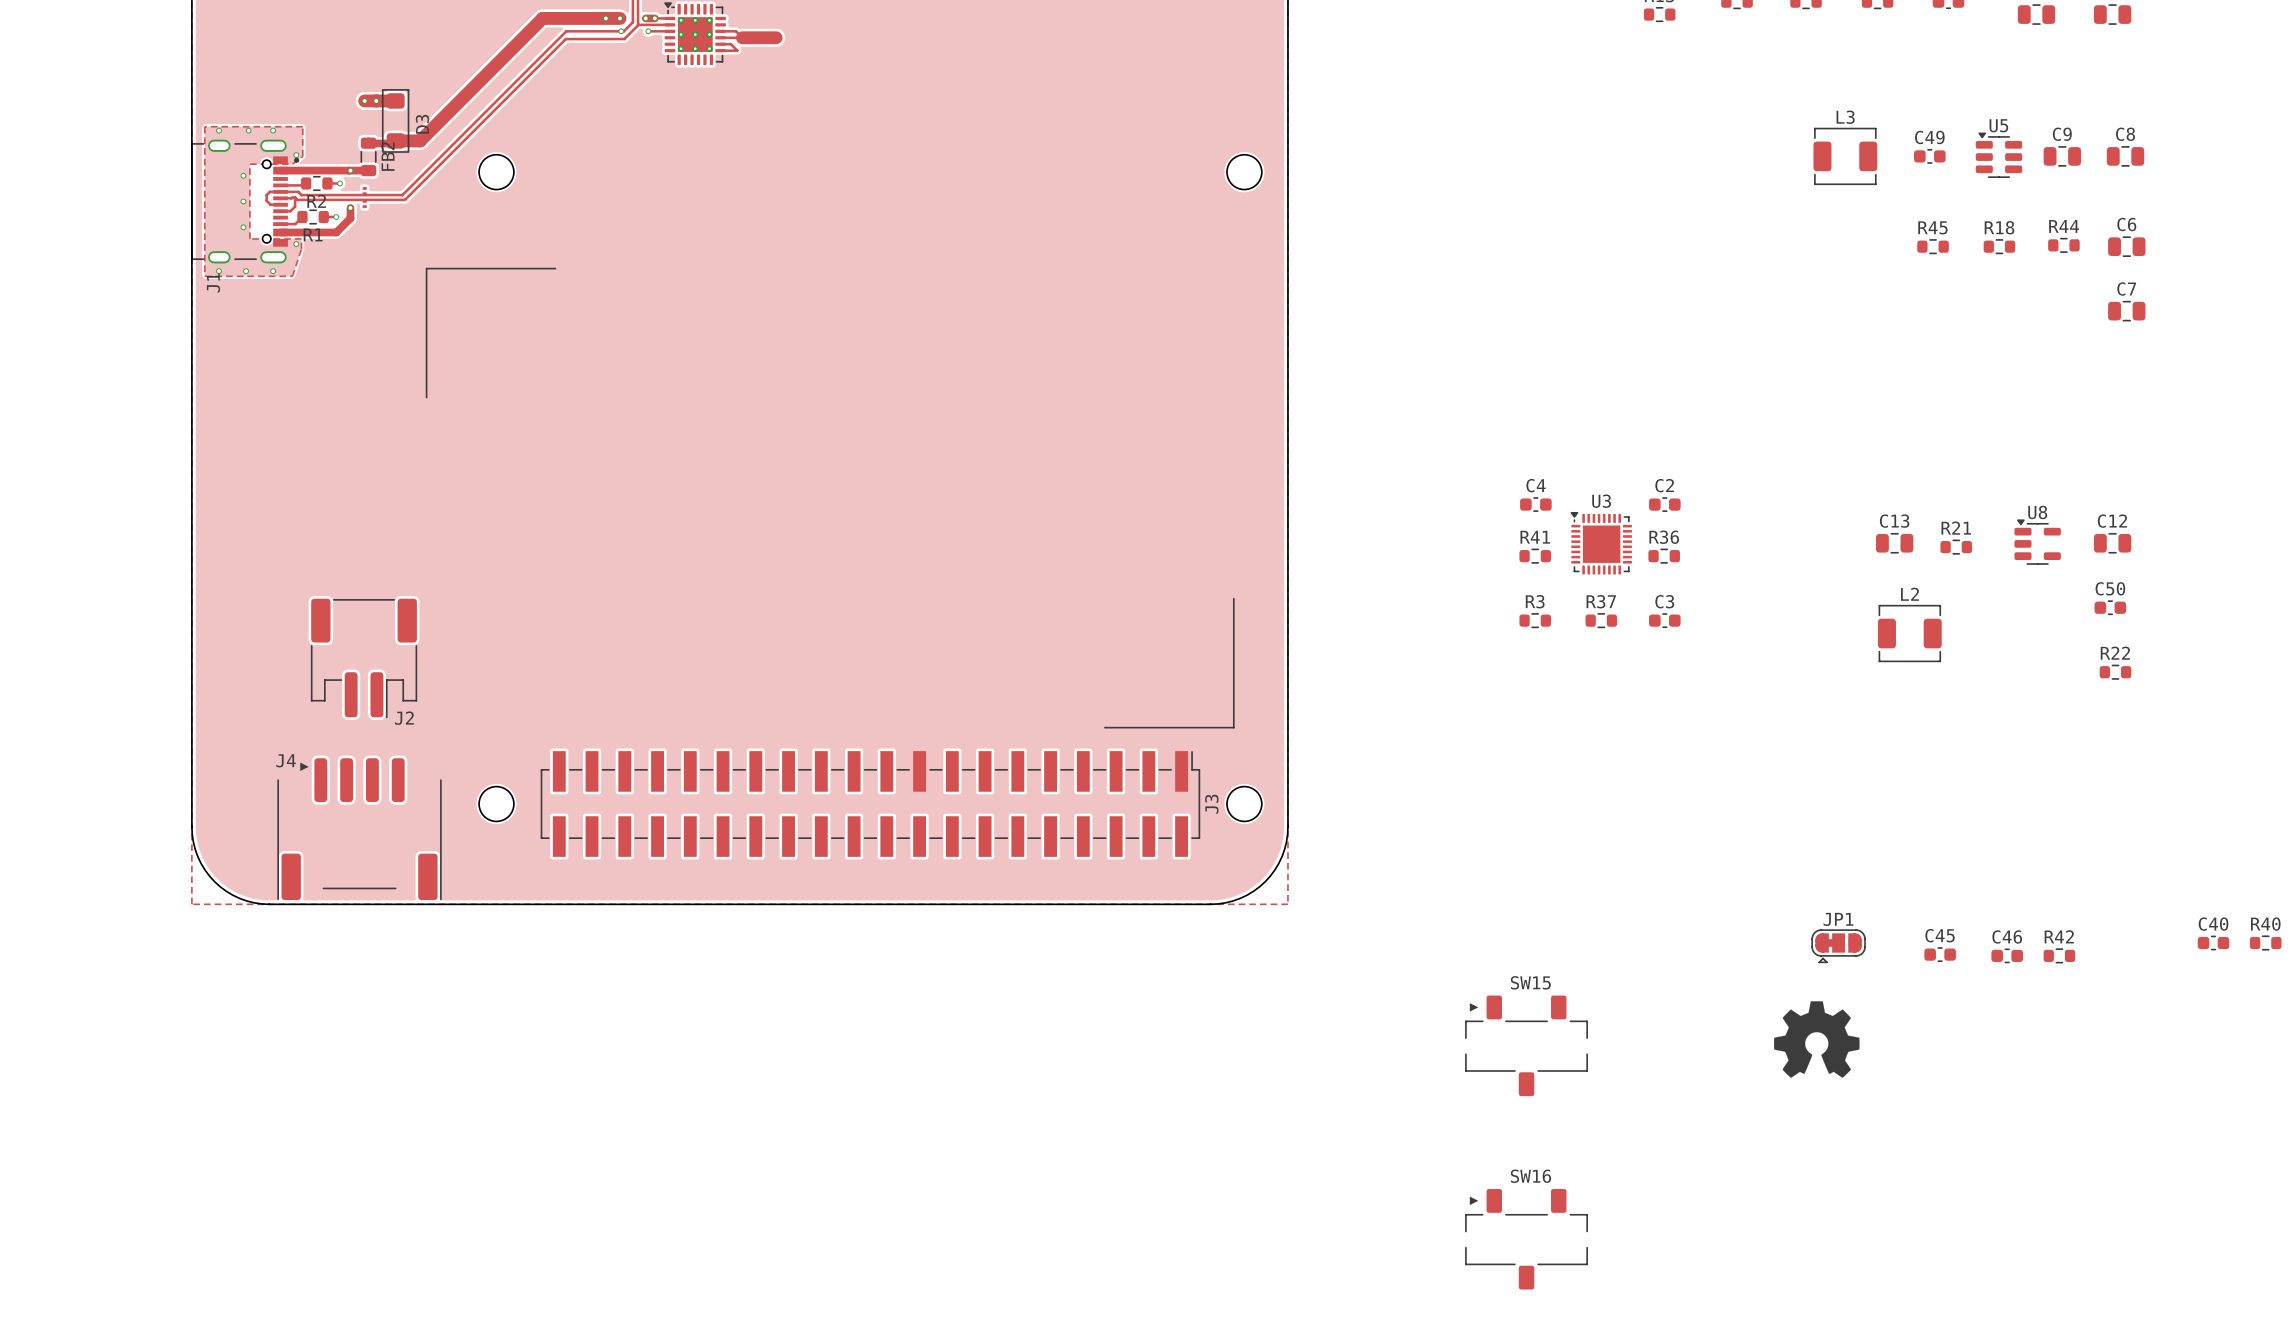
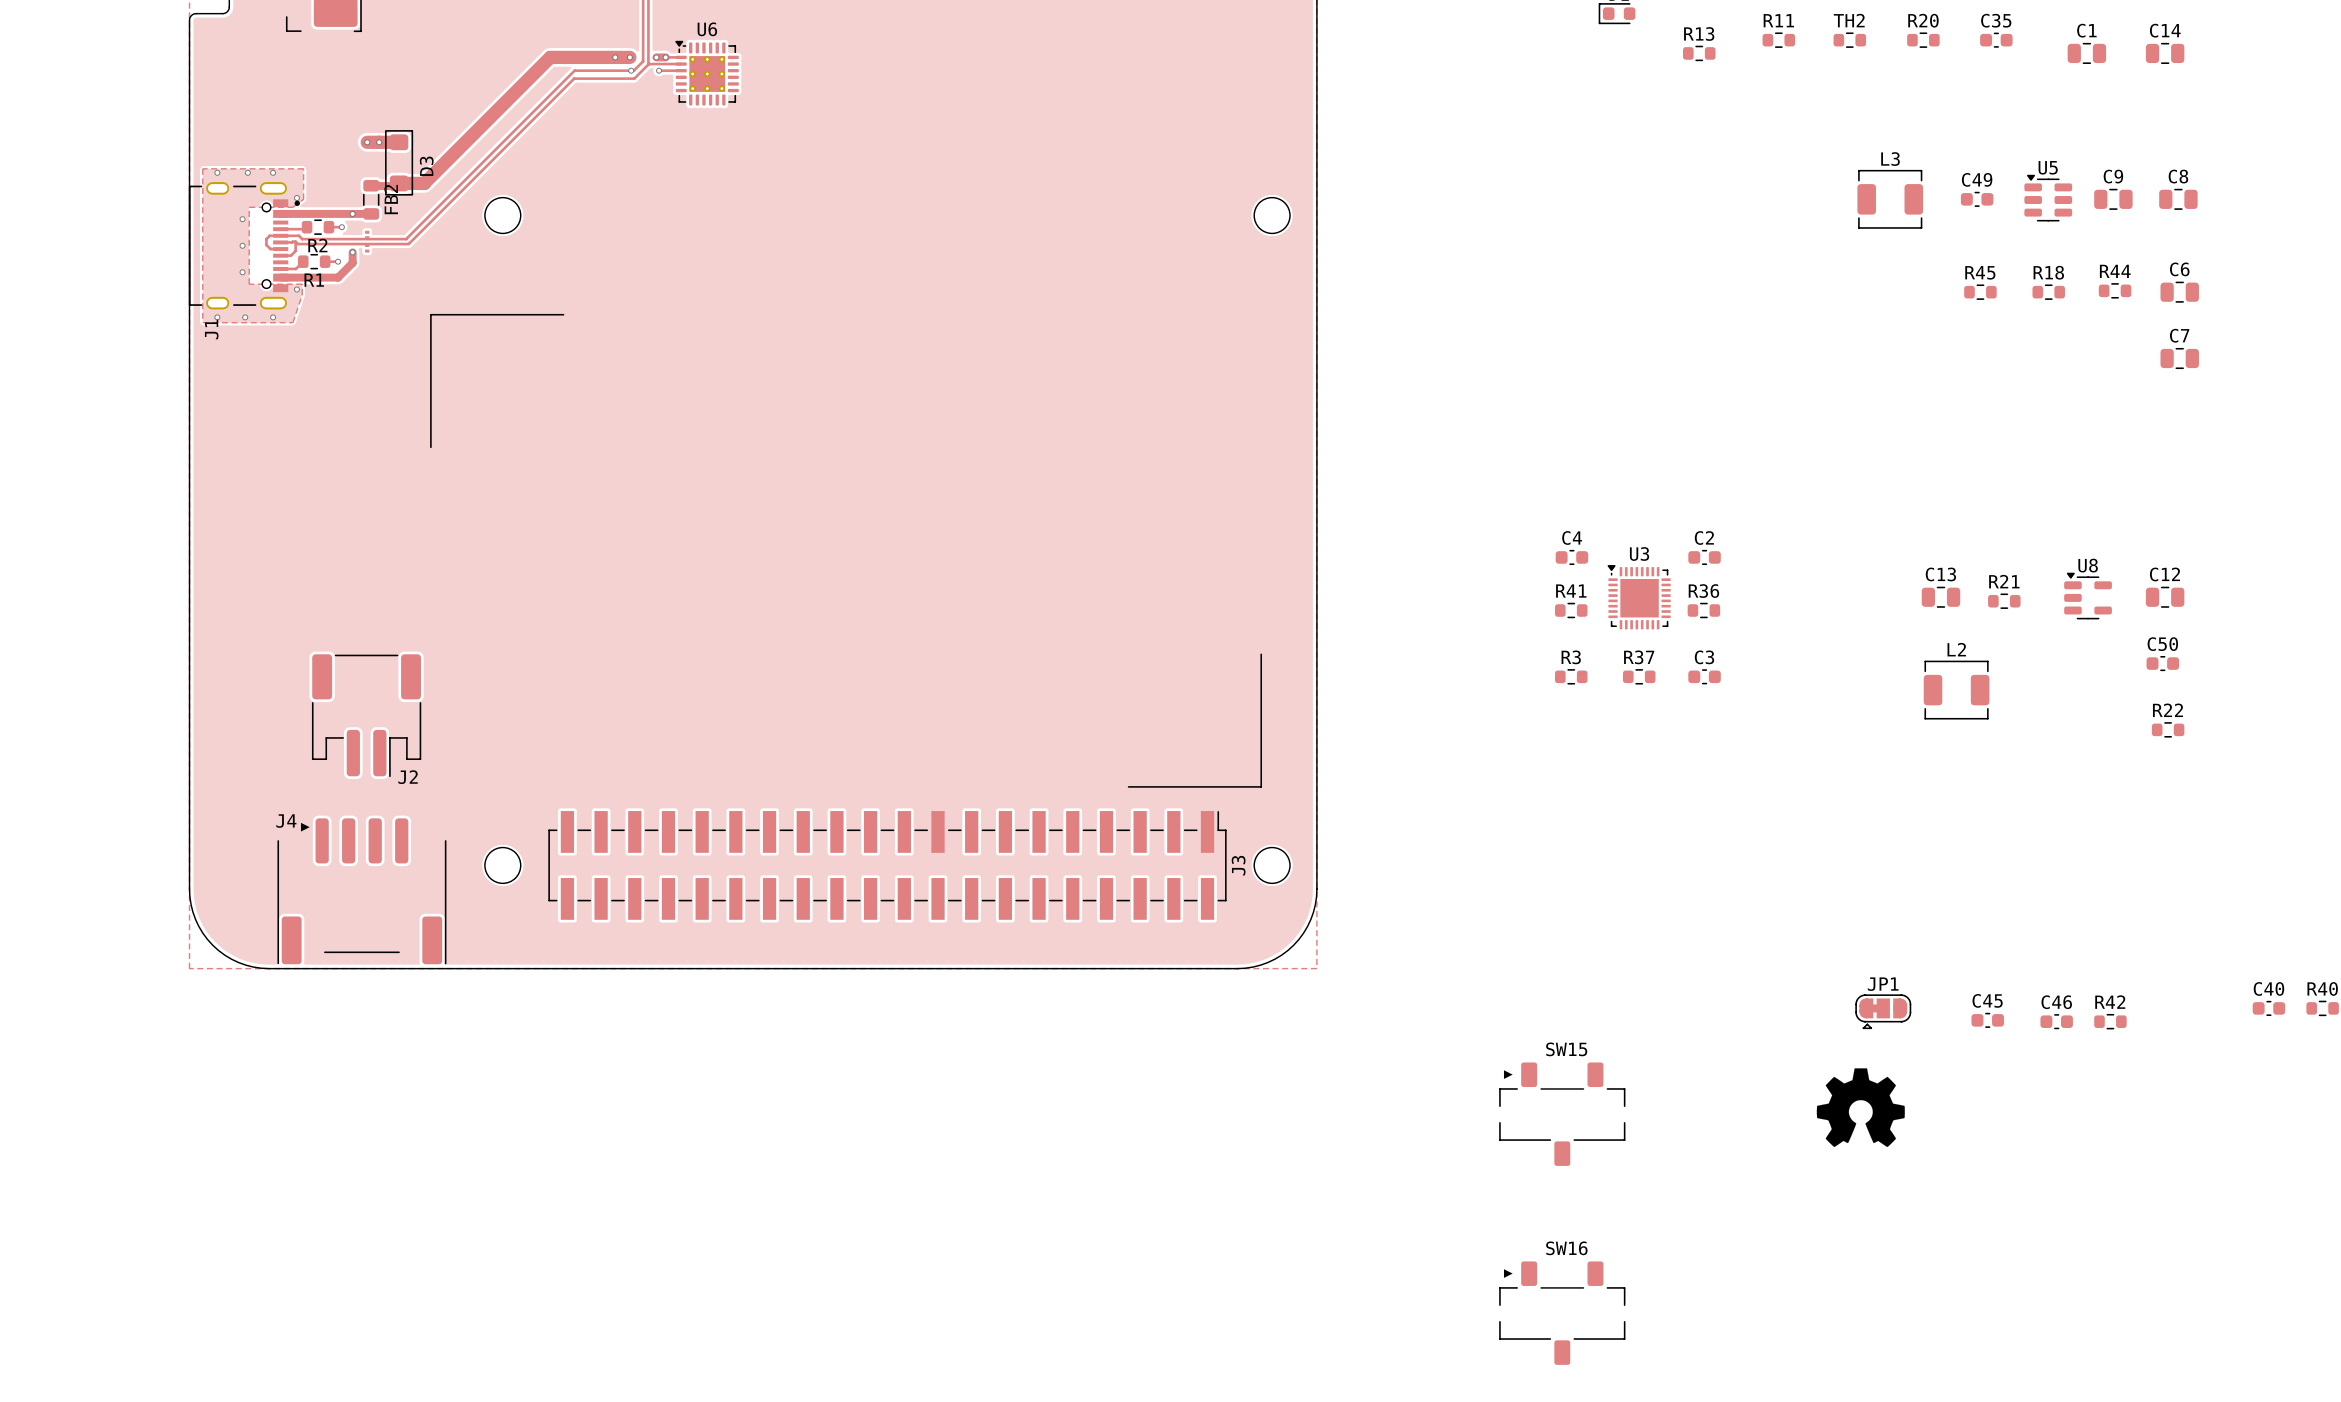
track: (720, 31) (735, 31) (742, 37) -> none
track: (720, 37) (742, 37) -> none
track: (742, 37) (776, 37) -> none
track: (720, 44) (730, 44) (737, 50) (720, 50) -> none

